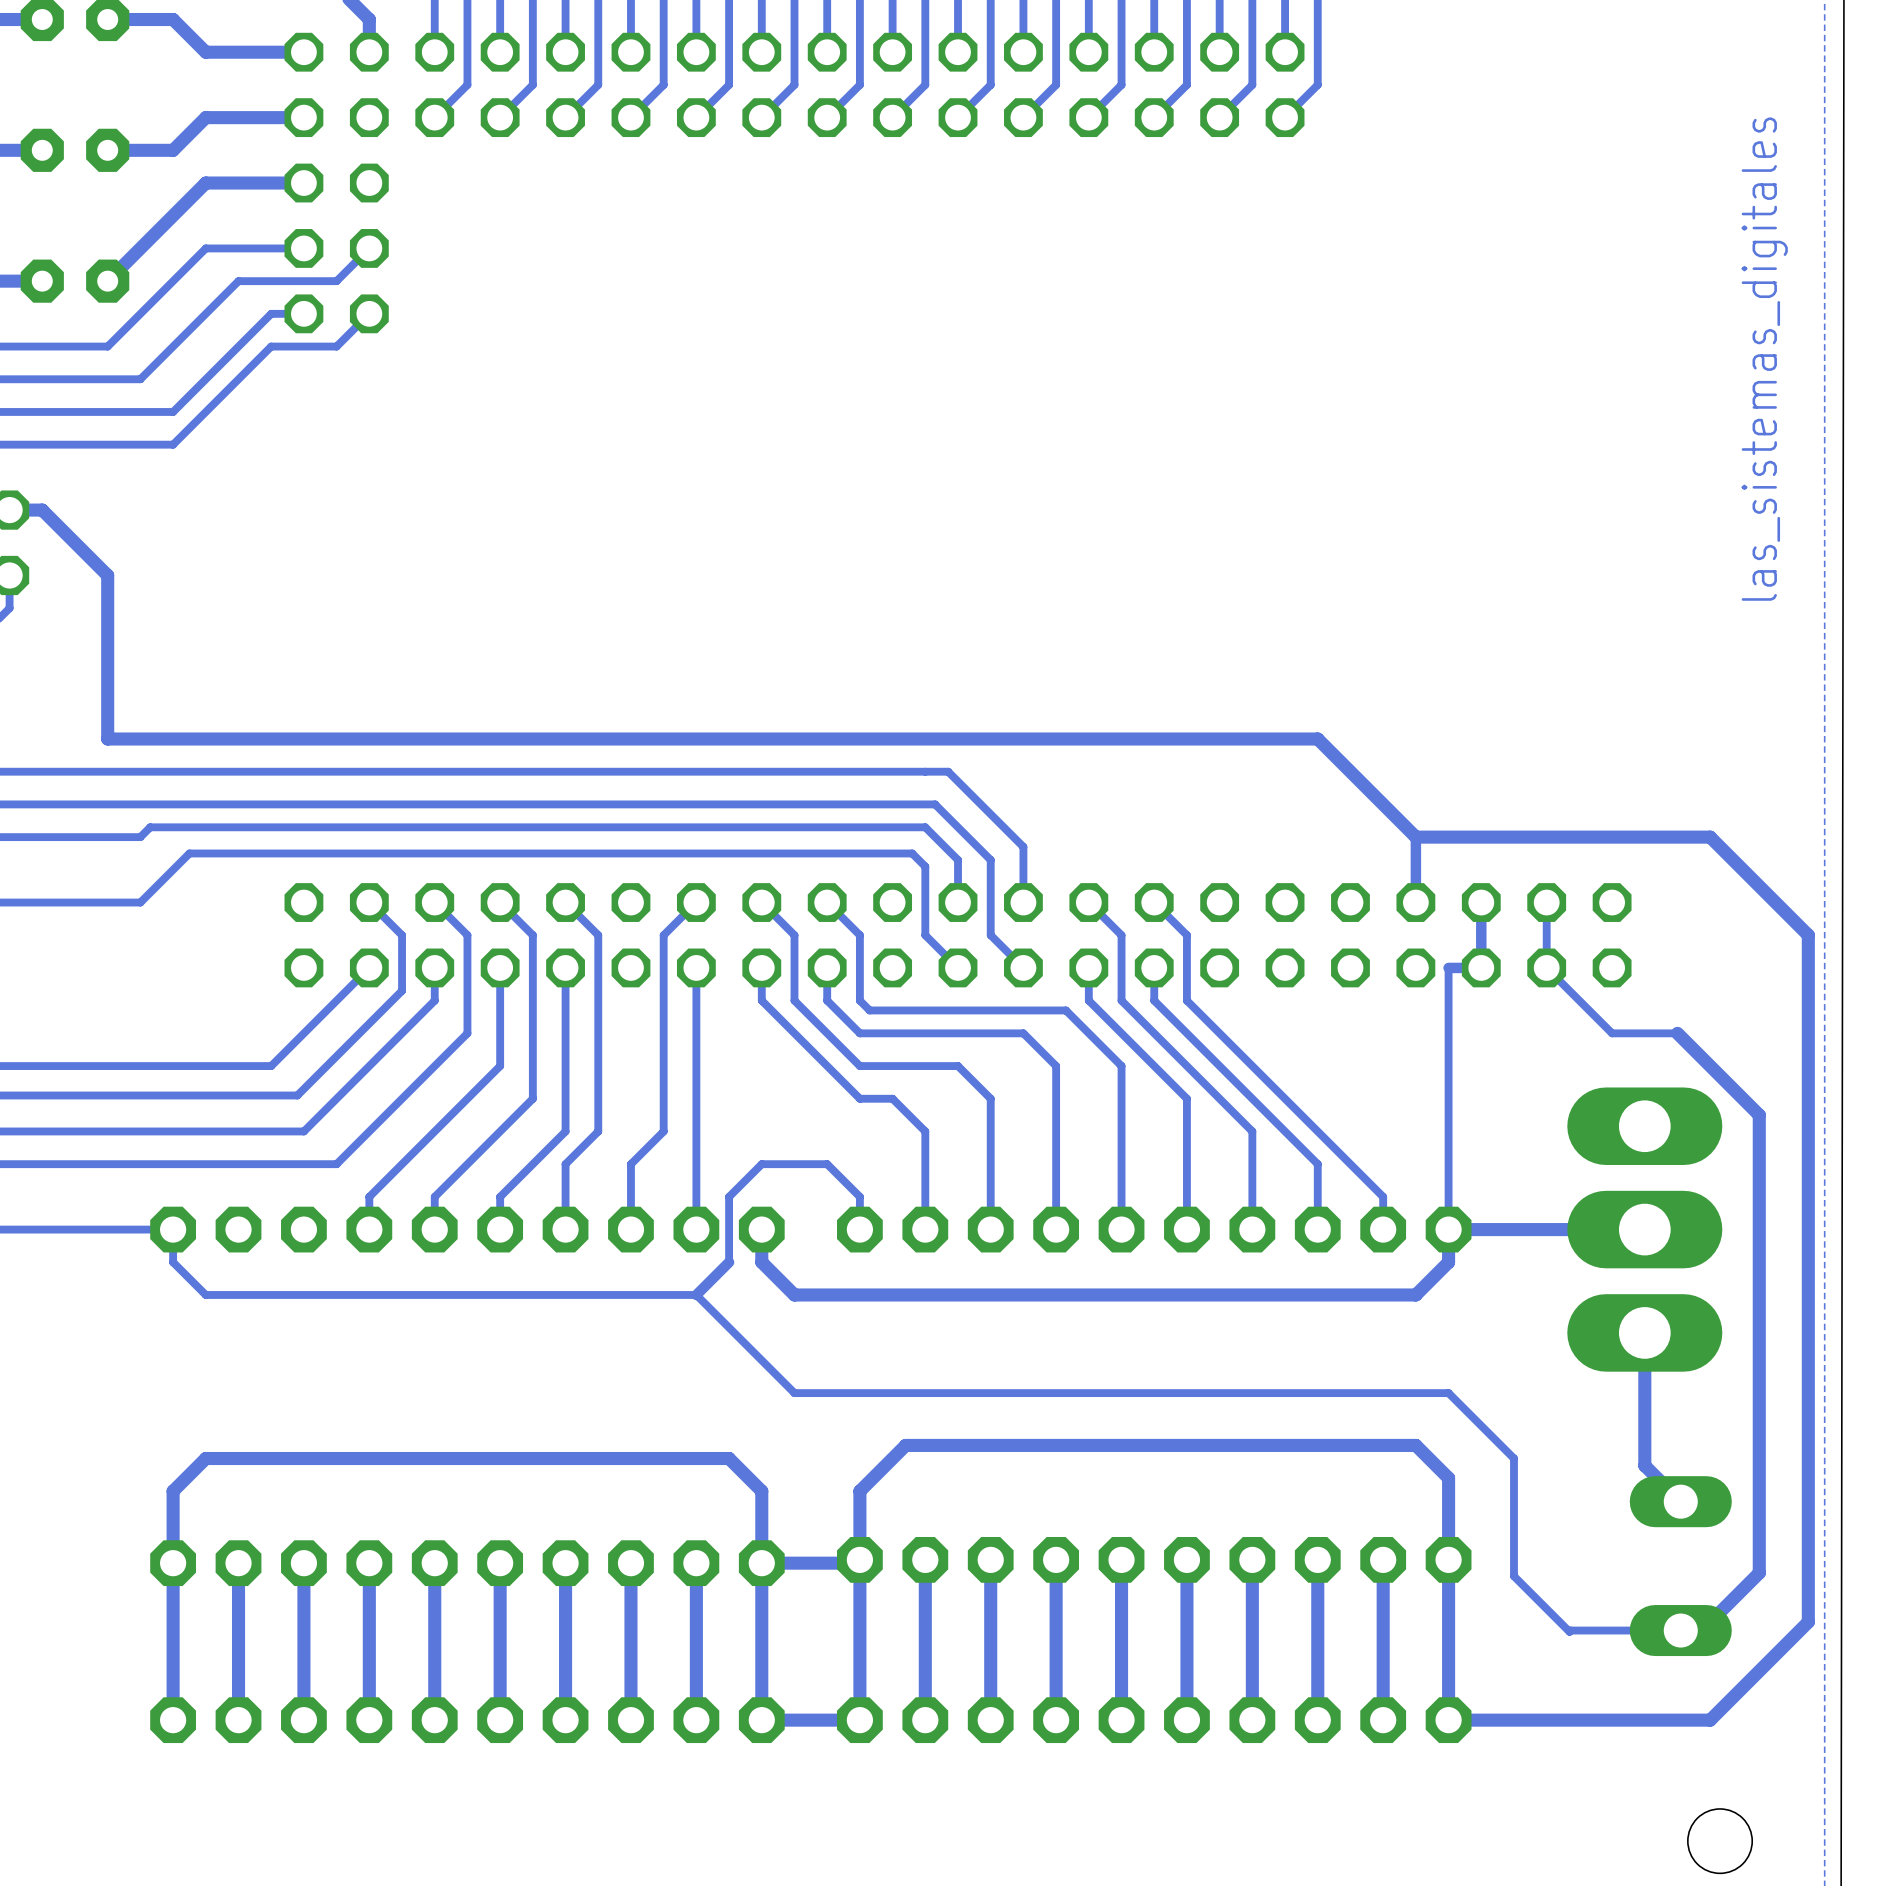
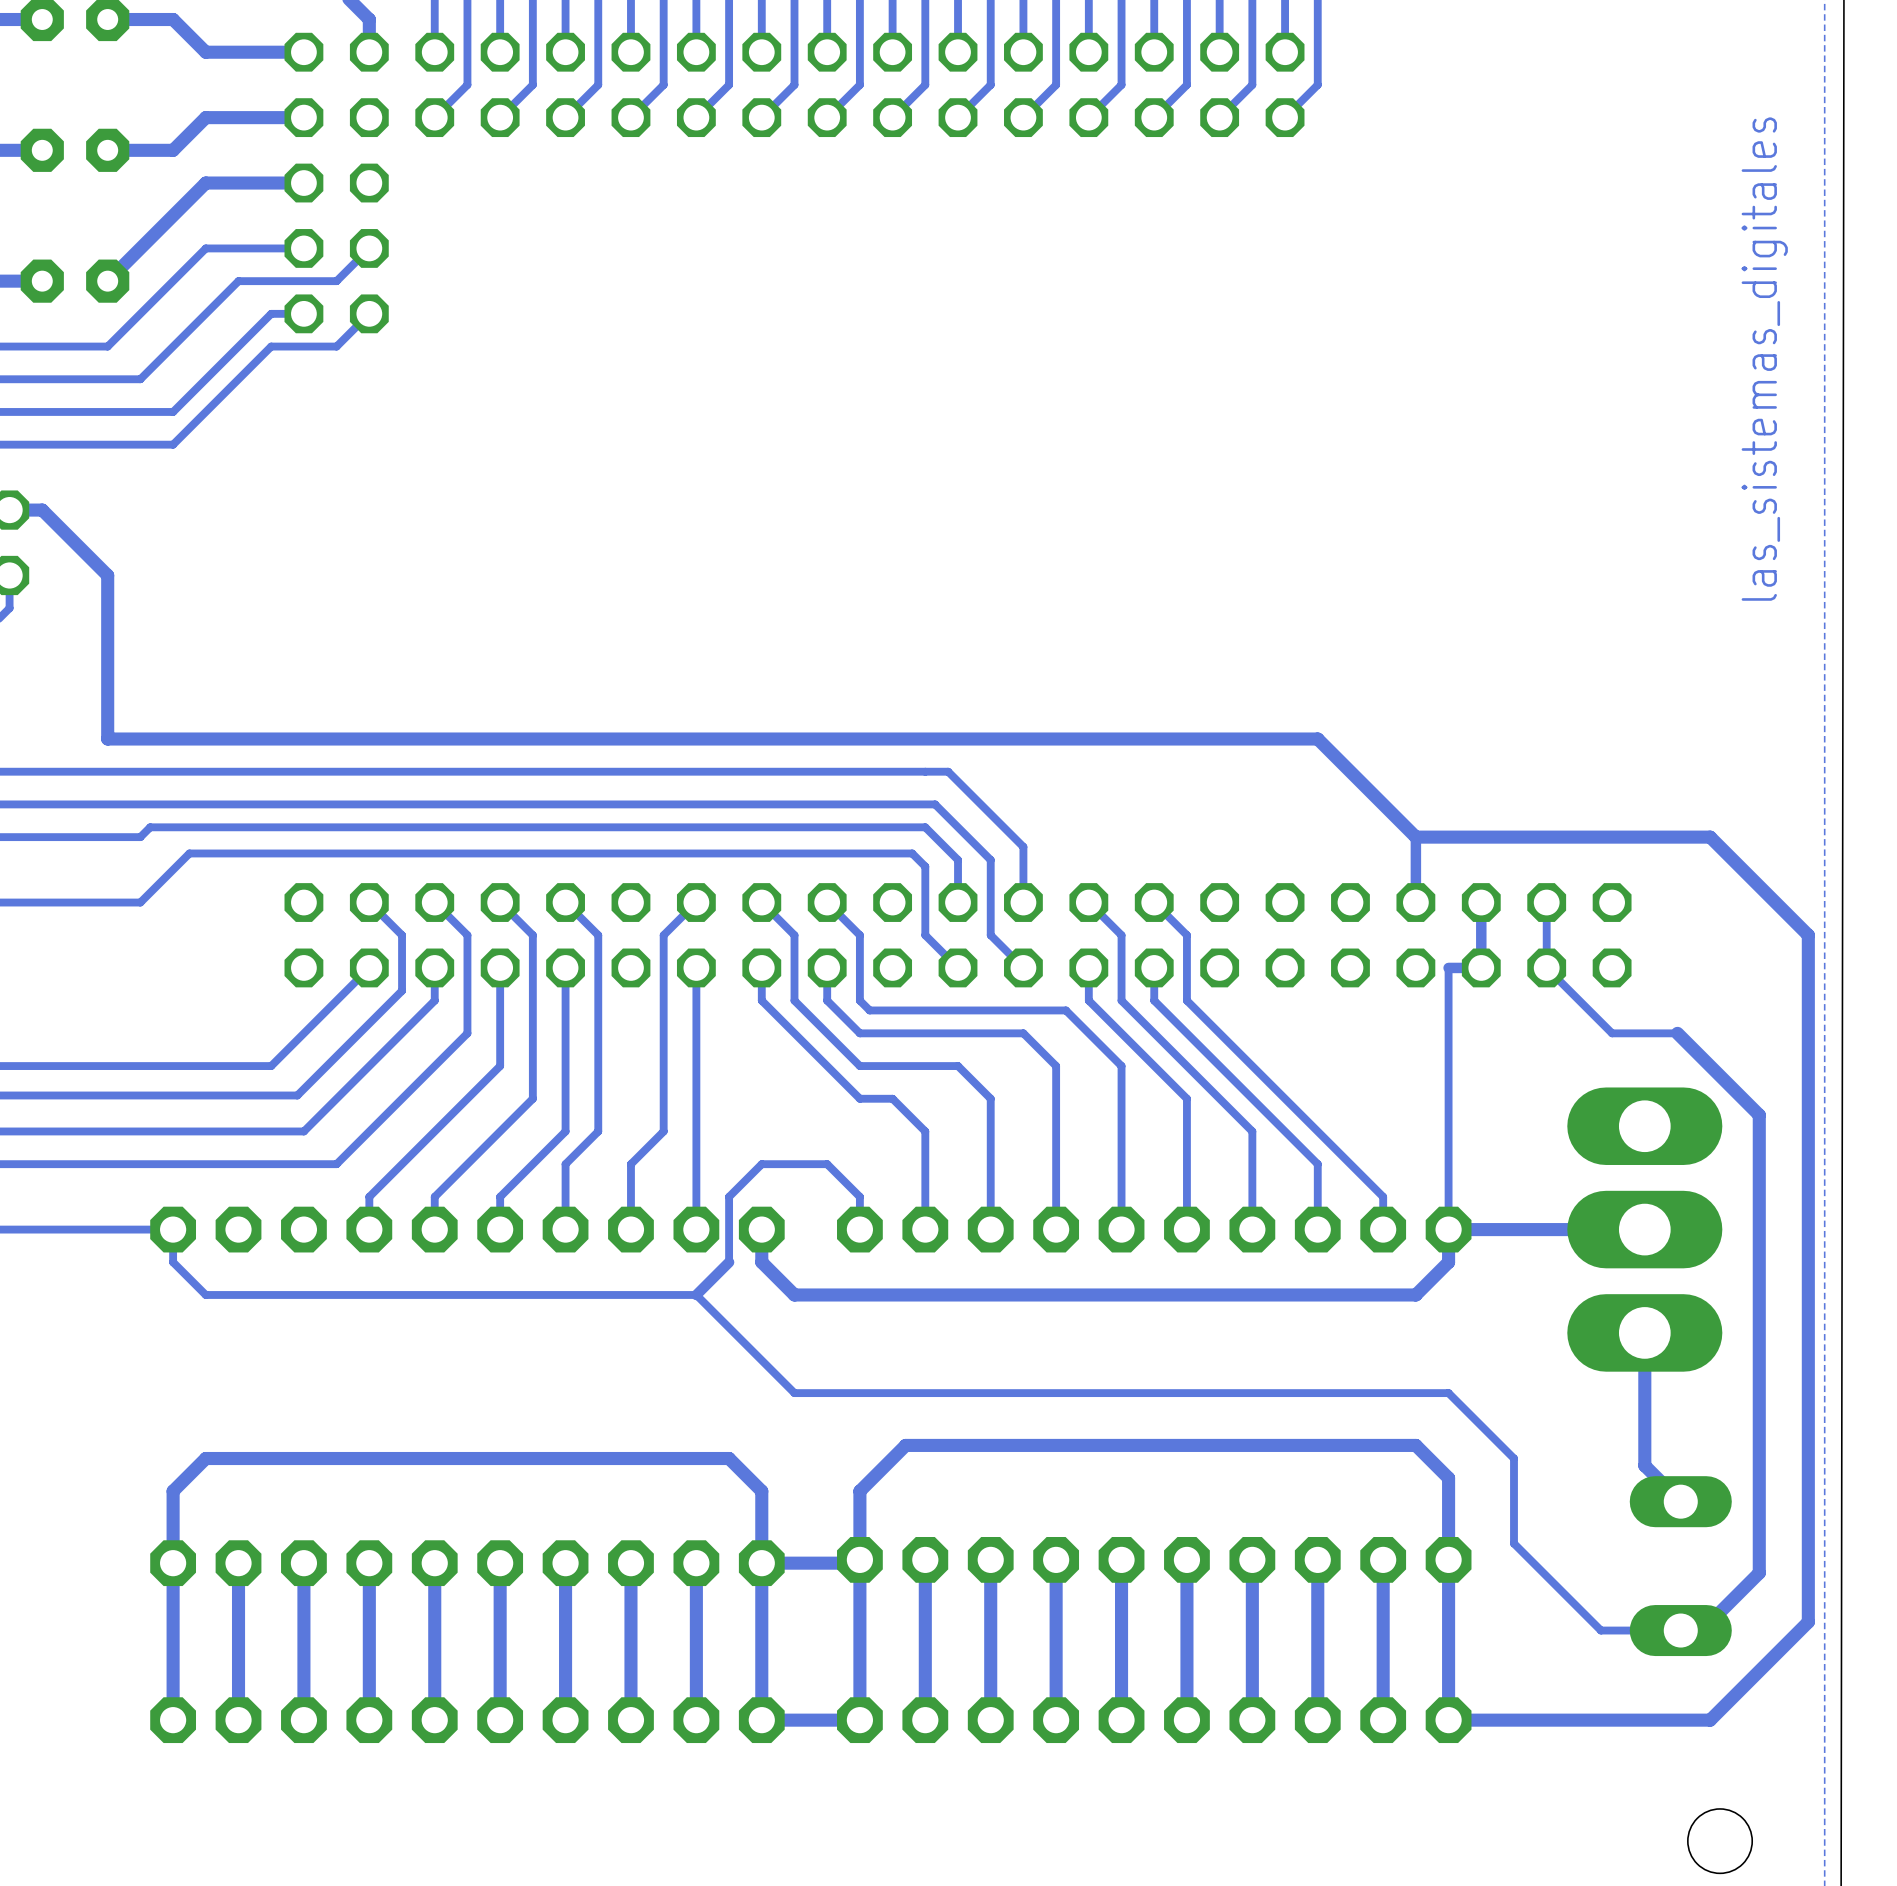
bottom track: (1513, 1543) (1513, 1576) (1569, 1631) (1600, 1630) -> (1513, 1543) (1600, 1630)

